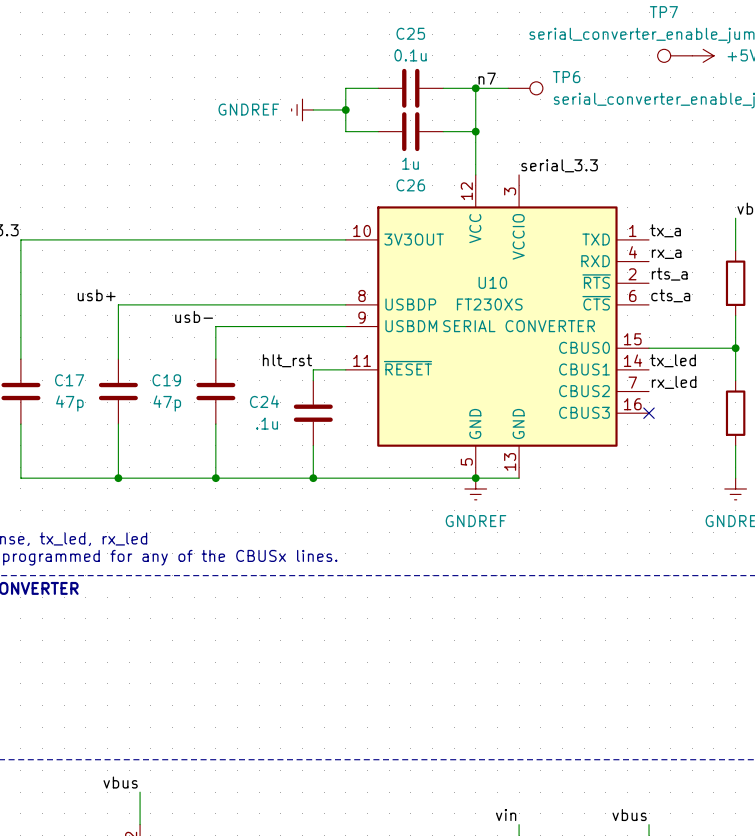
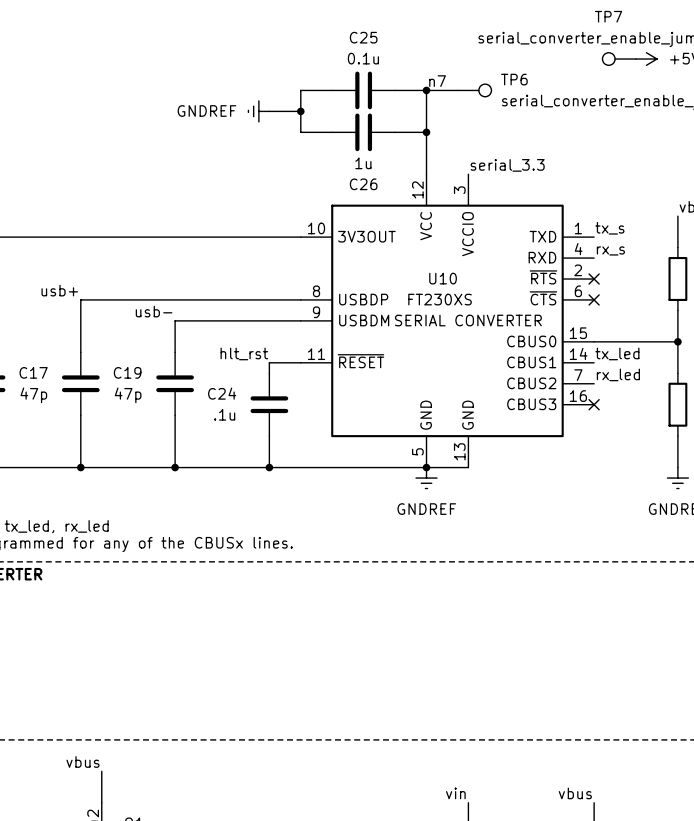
label: tx_a (665, 230) -> tx_s (609, 228)
label: rx_a (666, 254) -> rx_s (610, 250)
label: rts_a (669, 274) -> none
no-connect mark: none -> (594, 279)
label: cts_a (670, 295) -> none
no-connect mark: none -> (594, 299)

